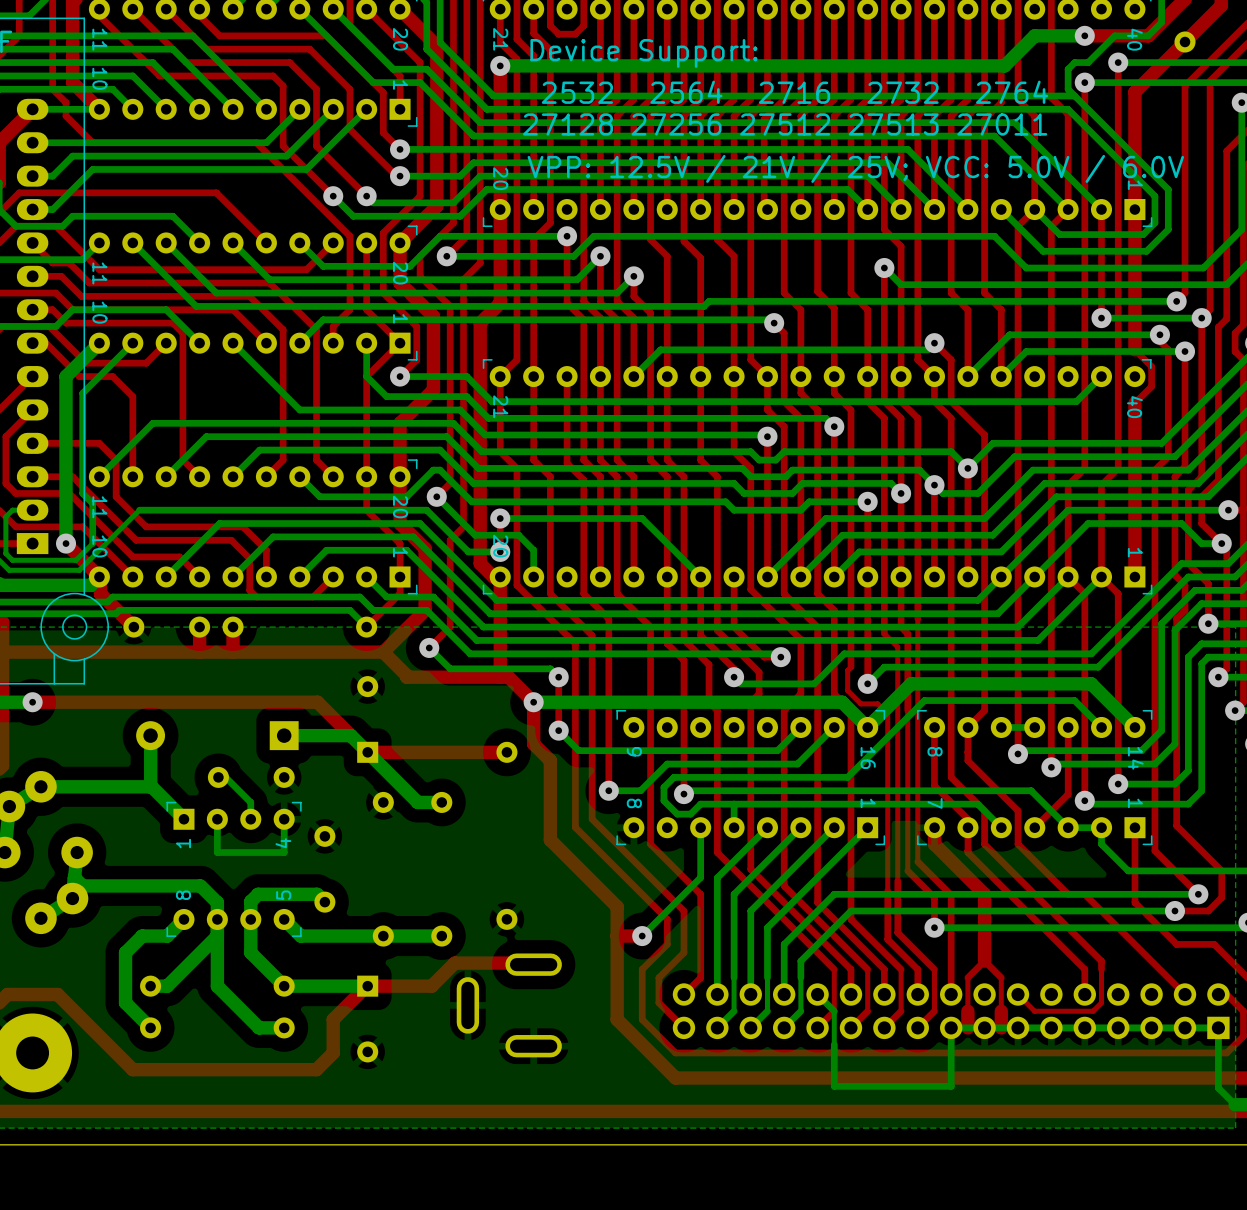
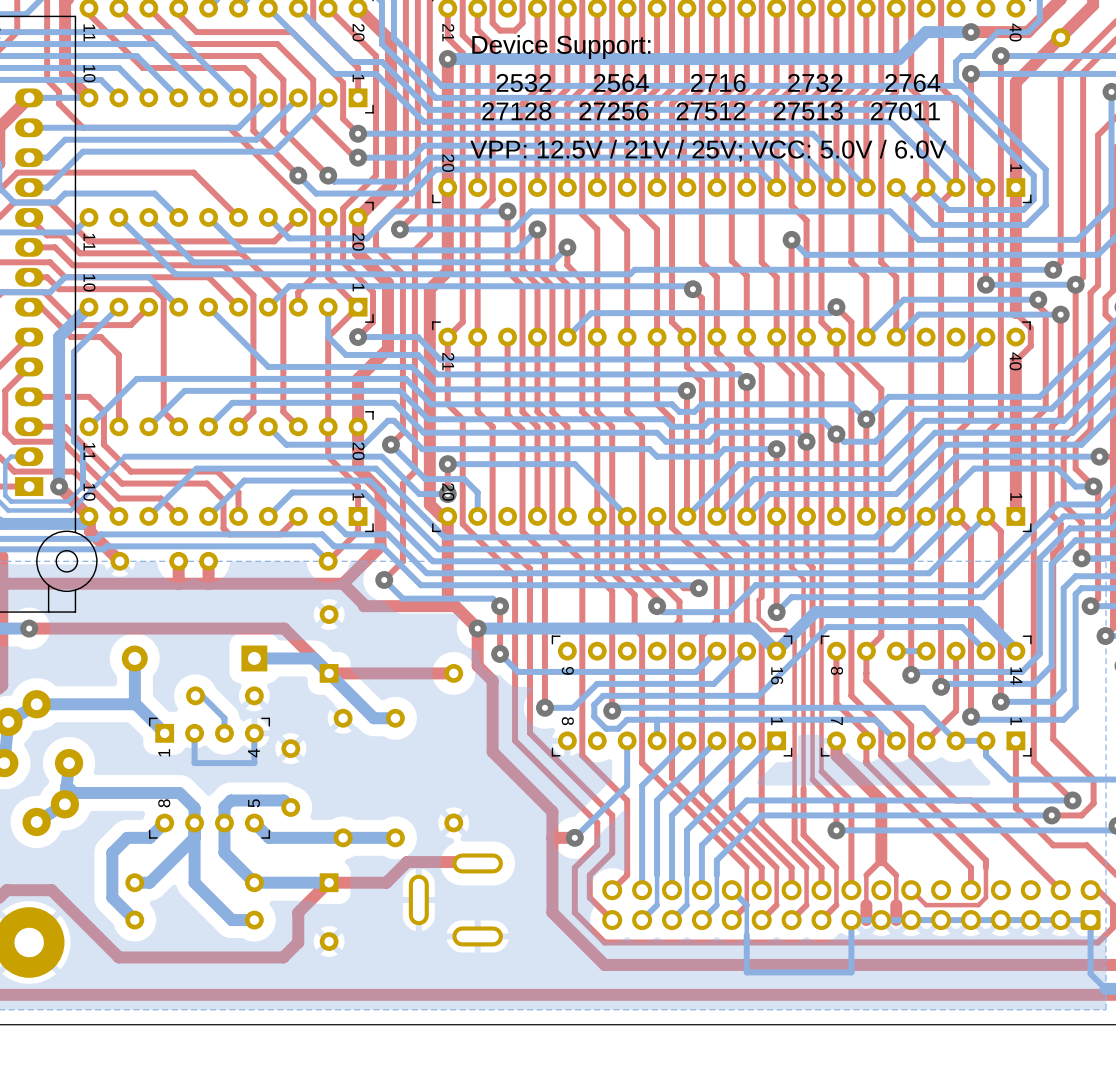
part footprint: [672, 983, 1230, 1040] -> [602, 880, 1101, 931]

